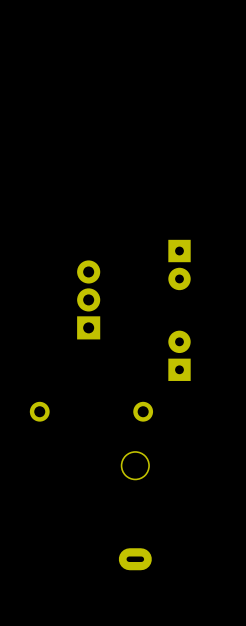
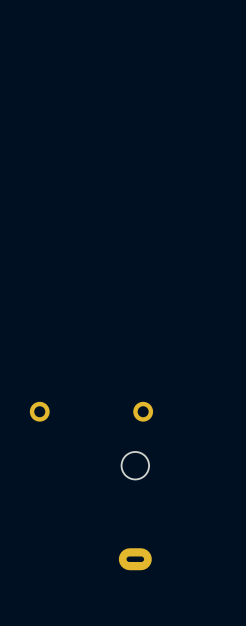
part: (179, 264) -> none
part: (88, 299) -> none
part: (179, 355) -> none

